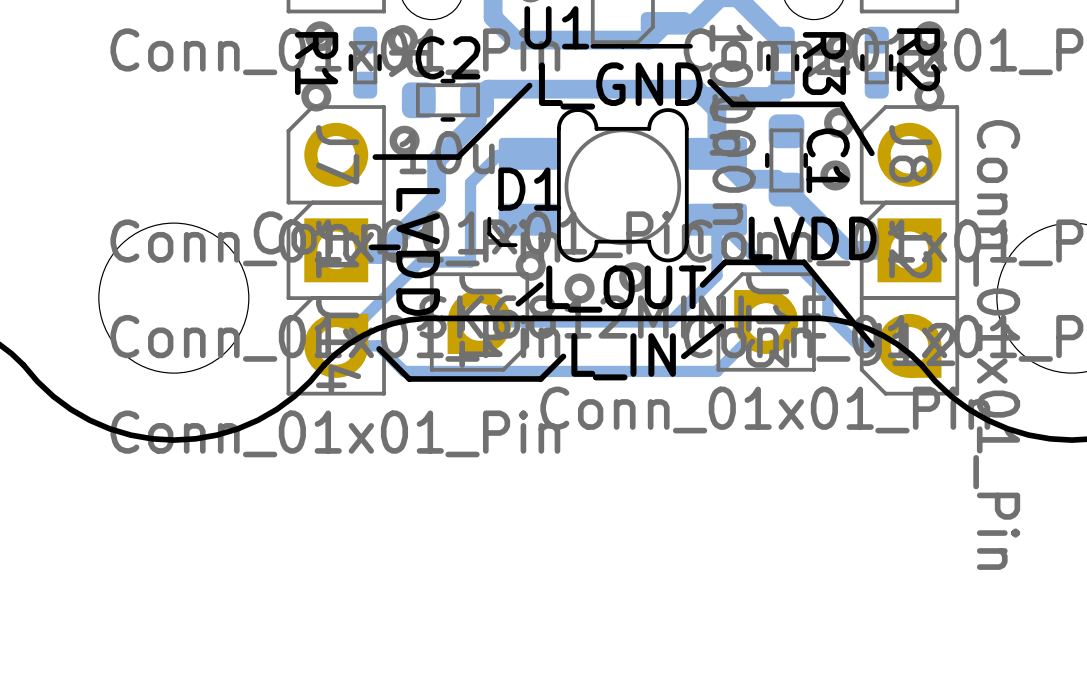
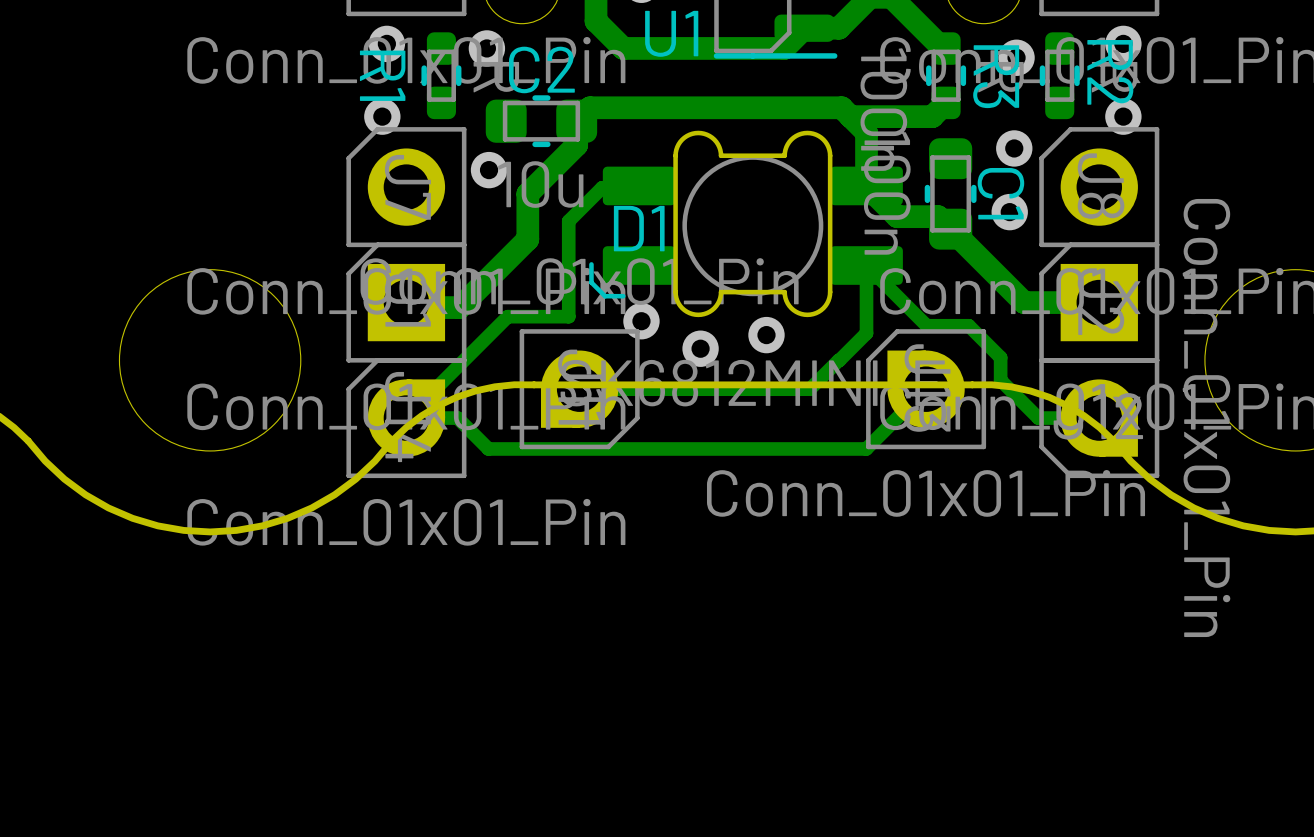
line: (710, 81) (732, 104) (841, 104) (871, 153) -> none
line: (529, 85) (458, 157) (375, 157) -> none
text: L_GND (620, 85) -> none
text: LVDD (812, 238) -> none
line: (397, 247) (371, 247) -> none
text: LVDD (418, 251) -> none
line: (540, 284) (518, 303) -> none
line: (702, 284) (725, 262) (804, 262) (871, 345) -> none
text: L_OUT (626, 289) -> none
line: (721, 326) (683, 356) -> none
line: (379, 348) (409, 378) (540, 378) (563, 356) -> none
text: L_IN (623, 356) -> none

